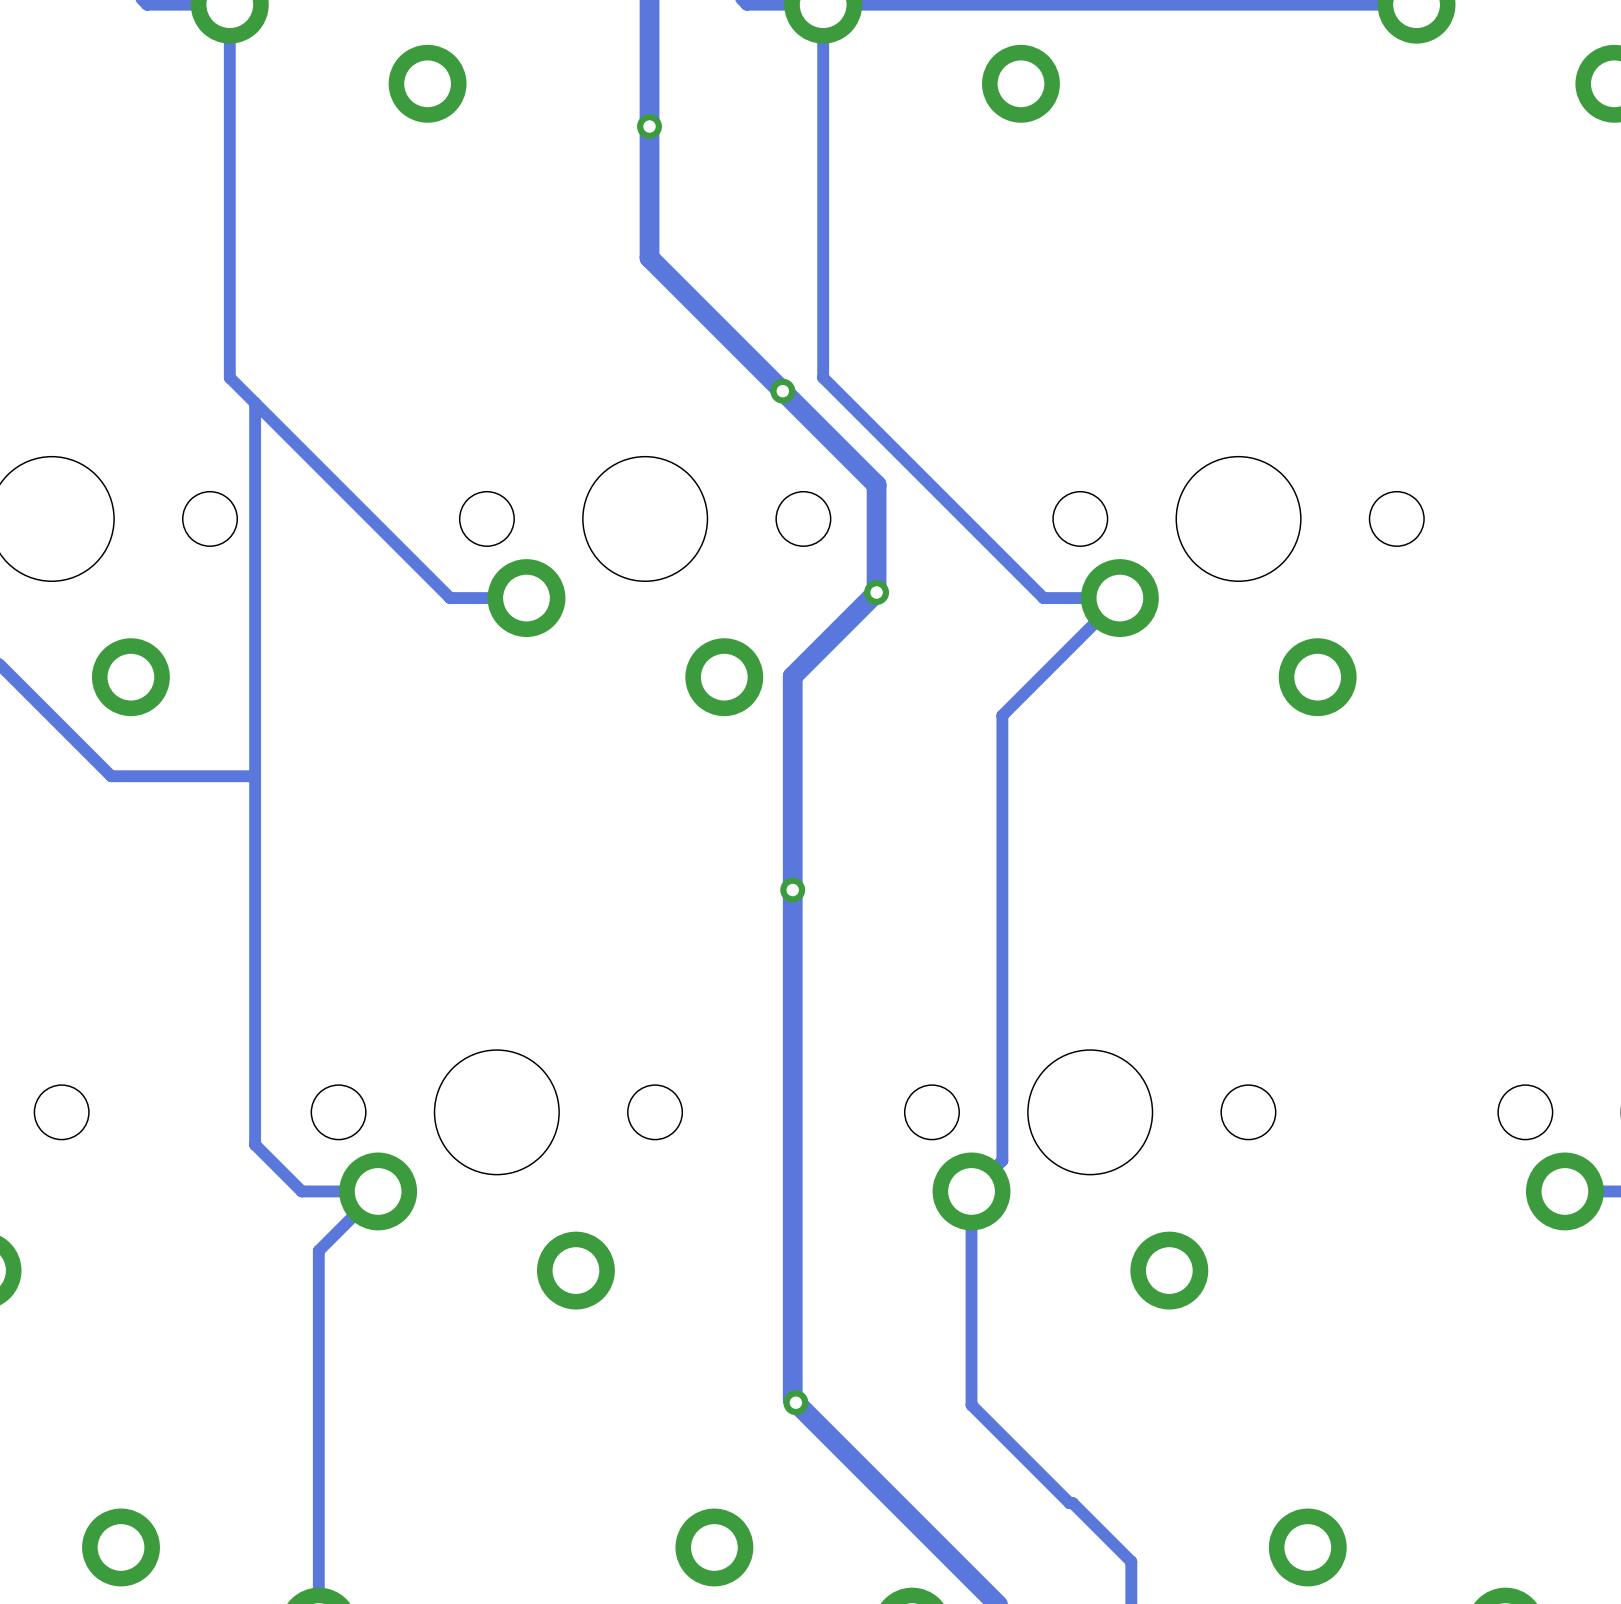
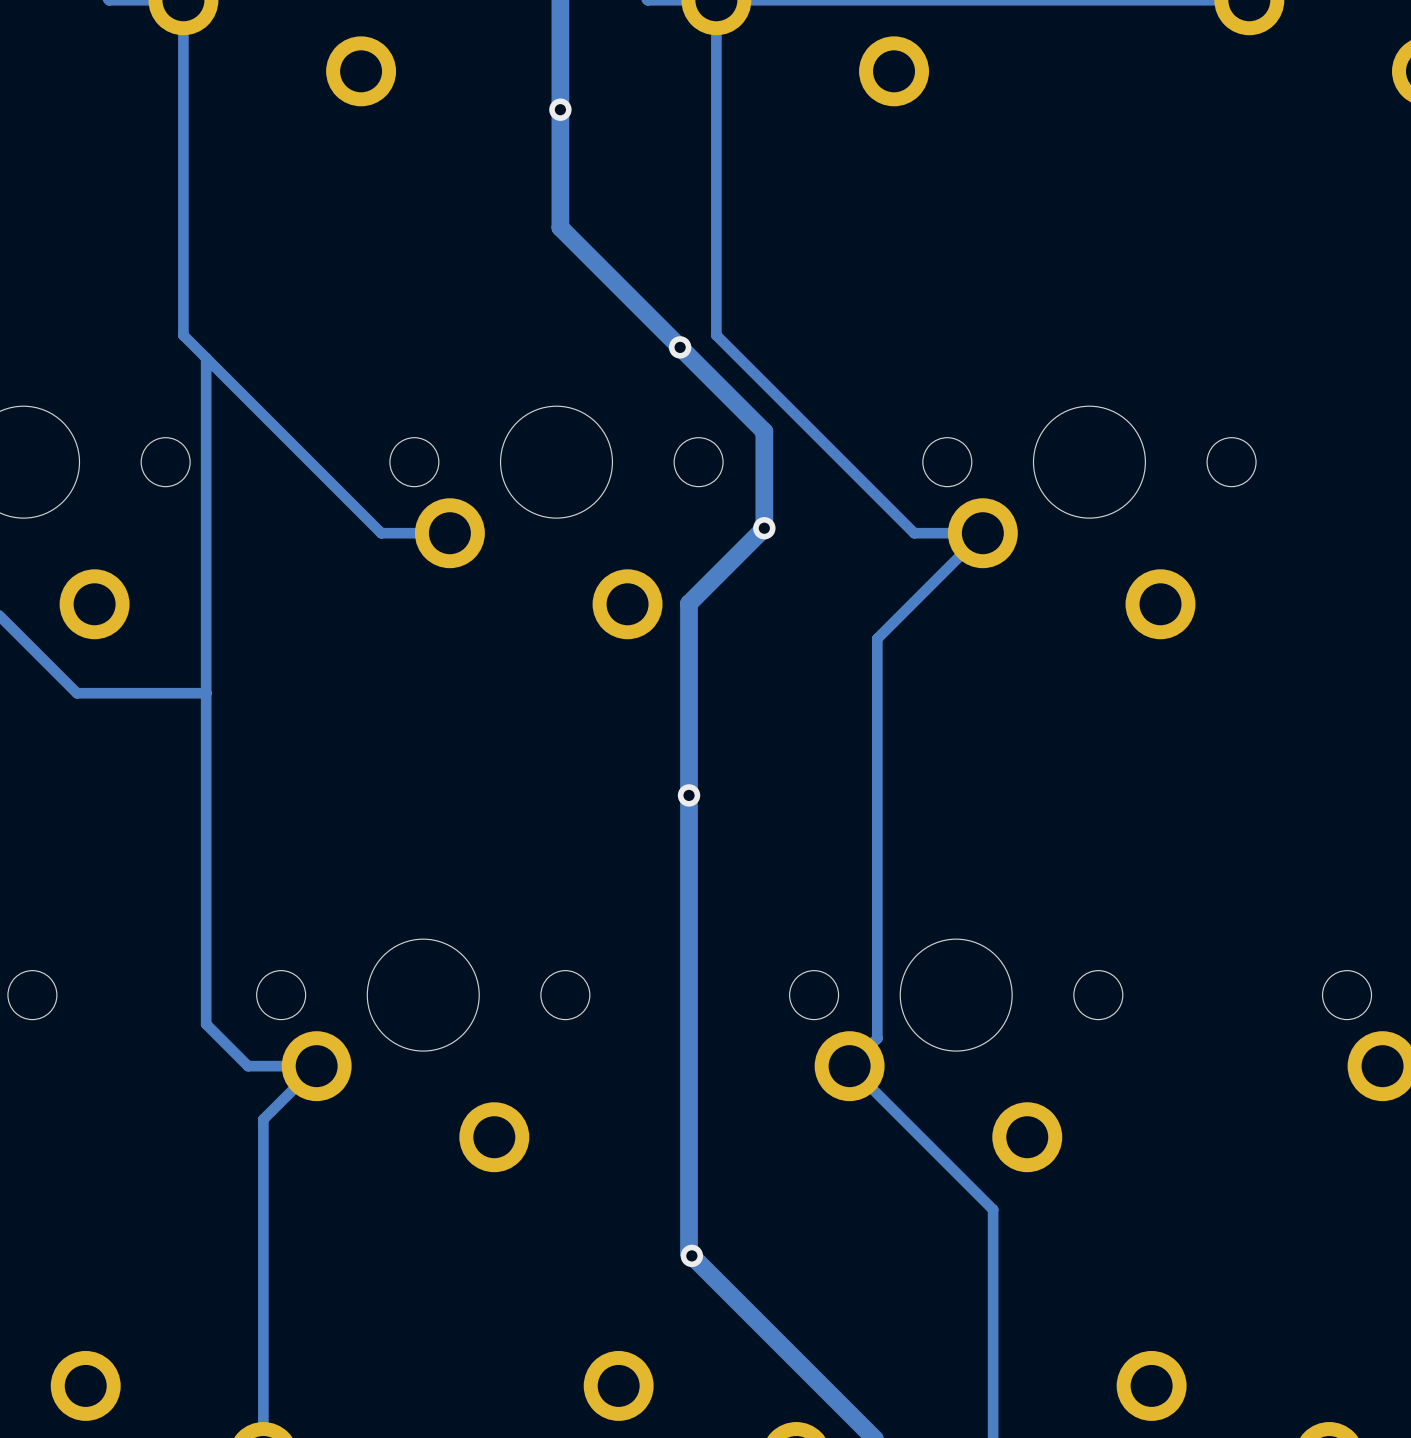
track: (971, 1191) (971, 1405) (1131, 1561) -> (849, 1066) (993, 1209) (993, 1398)

